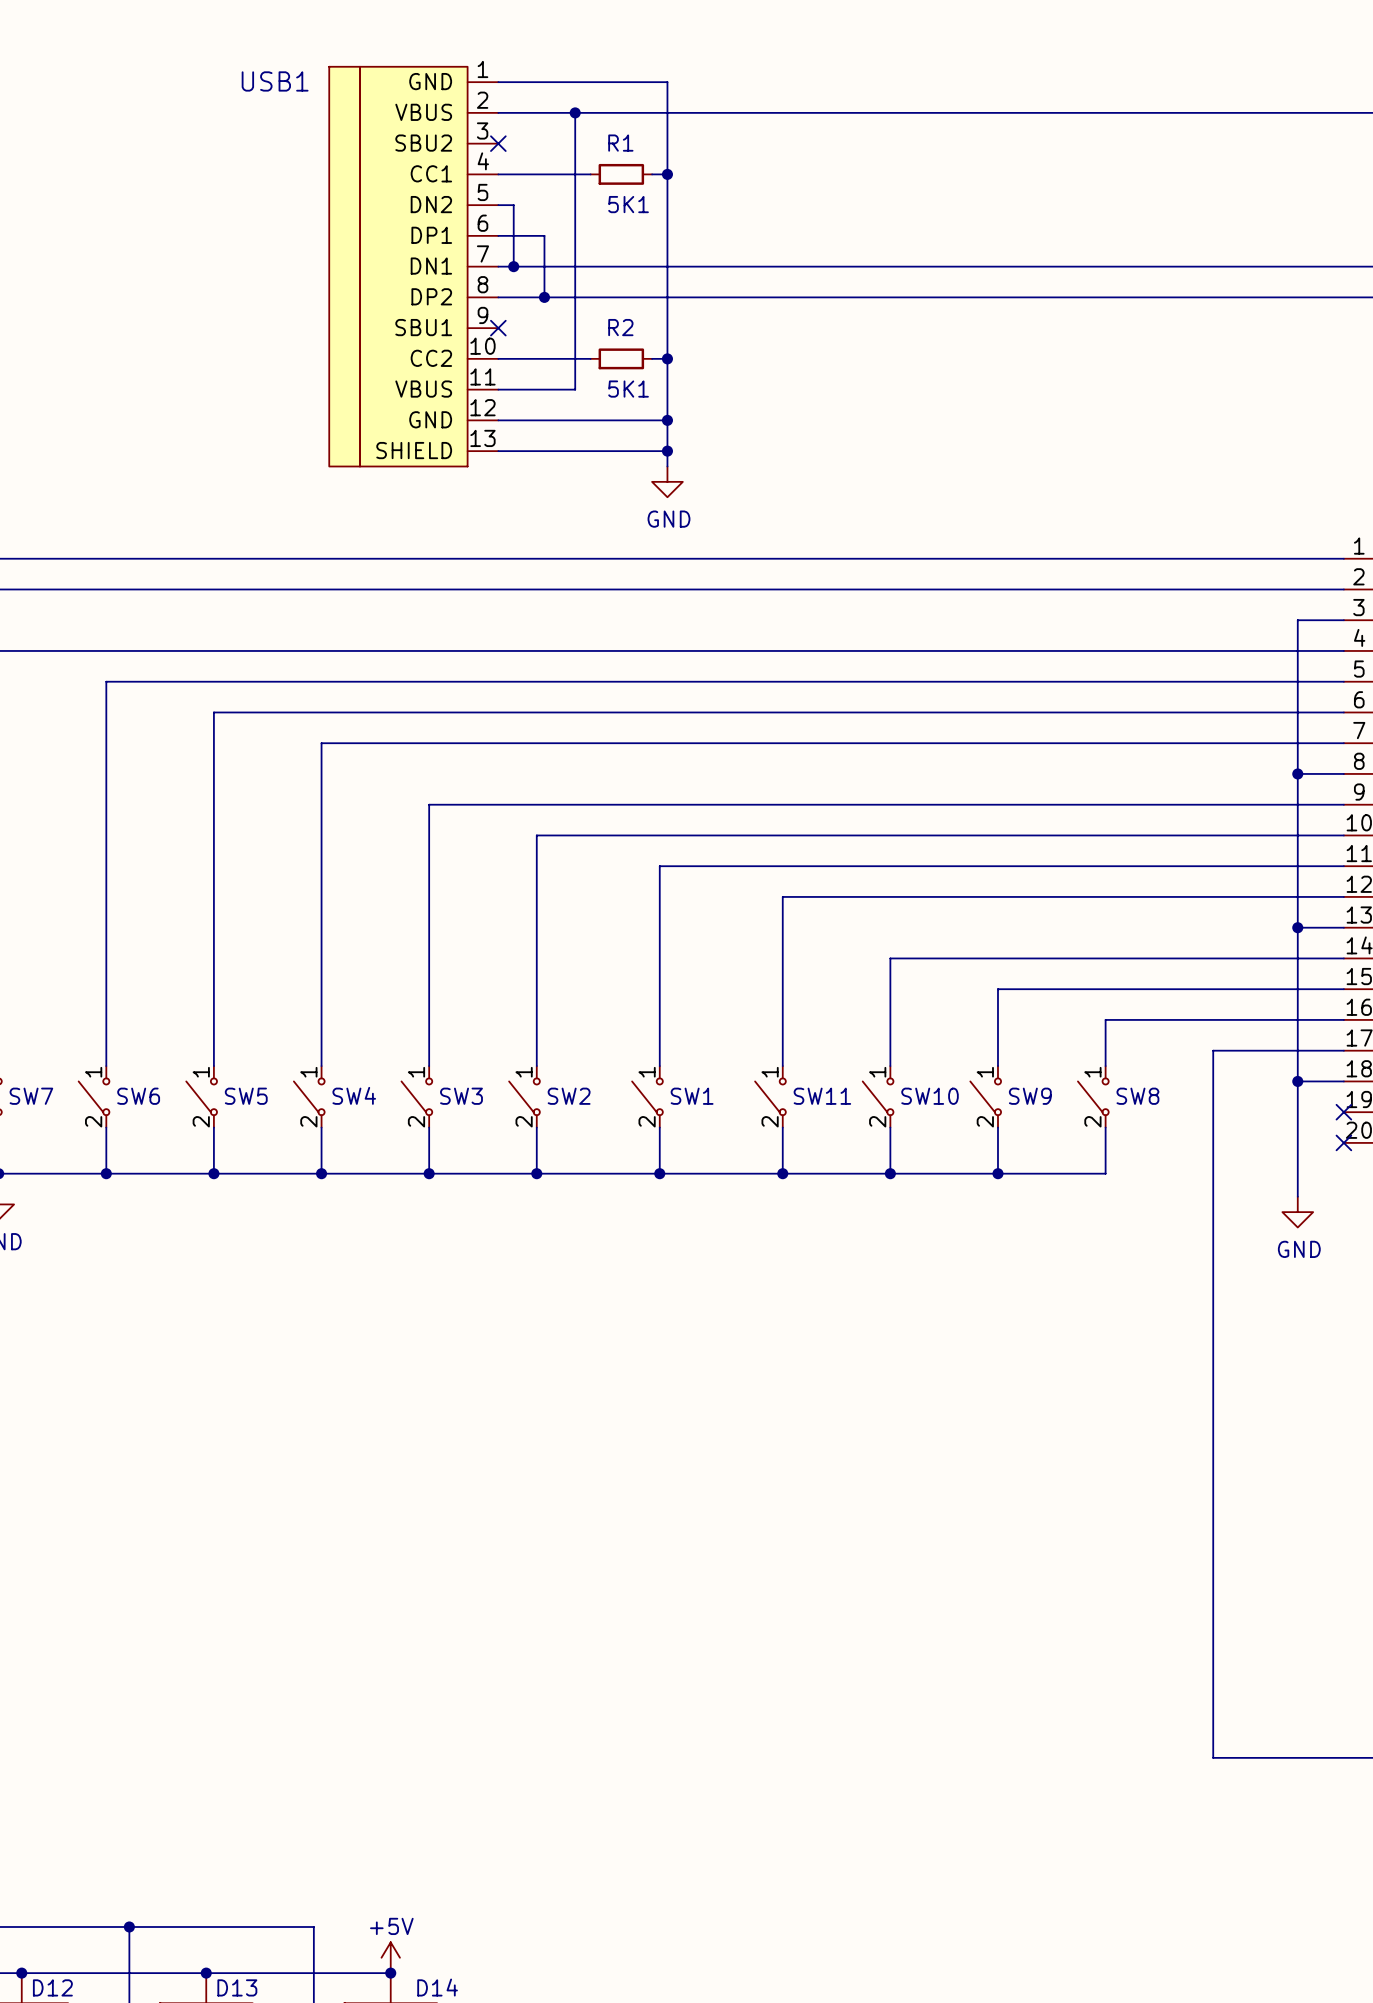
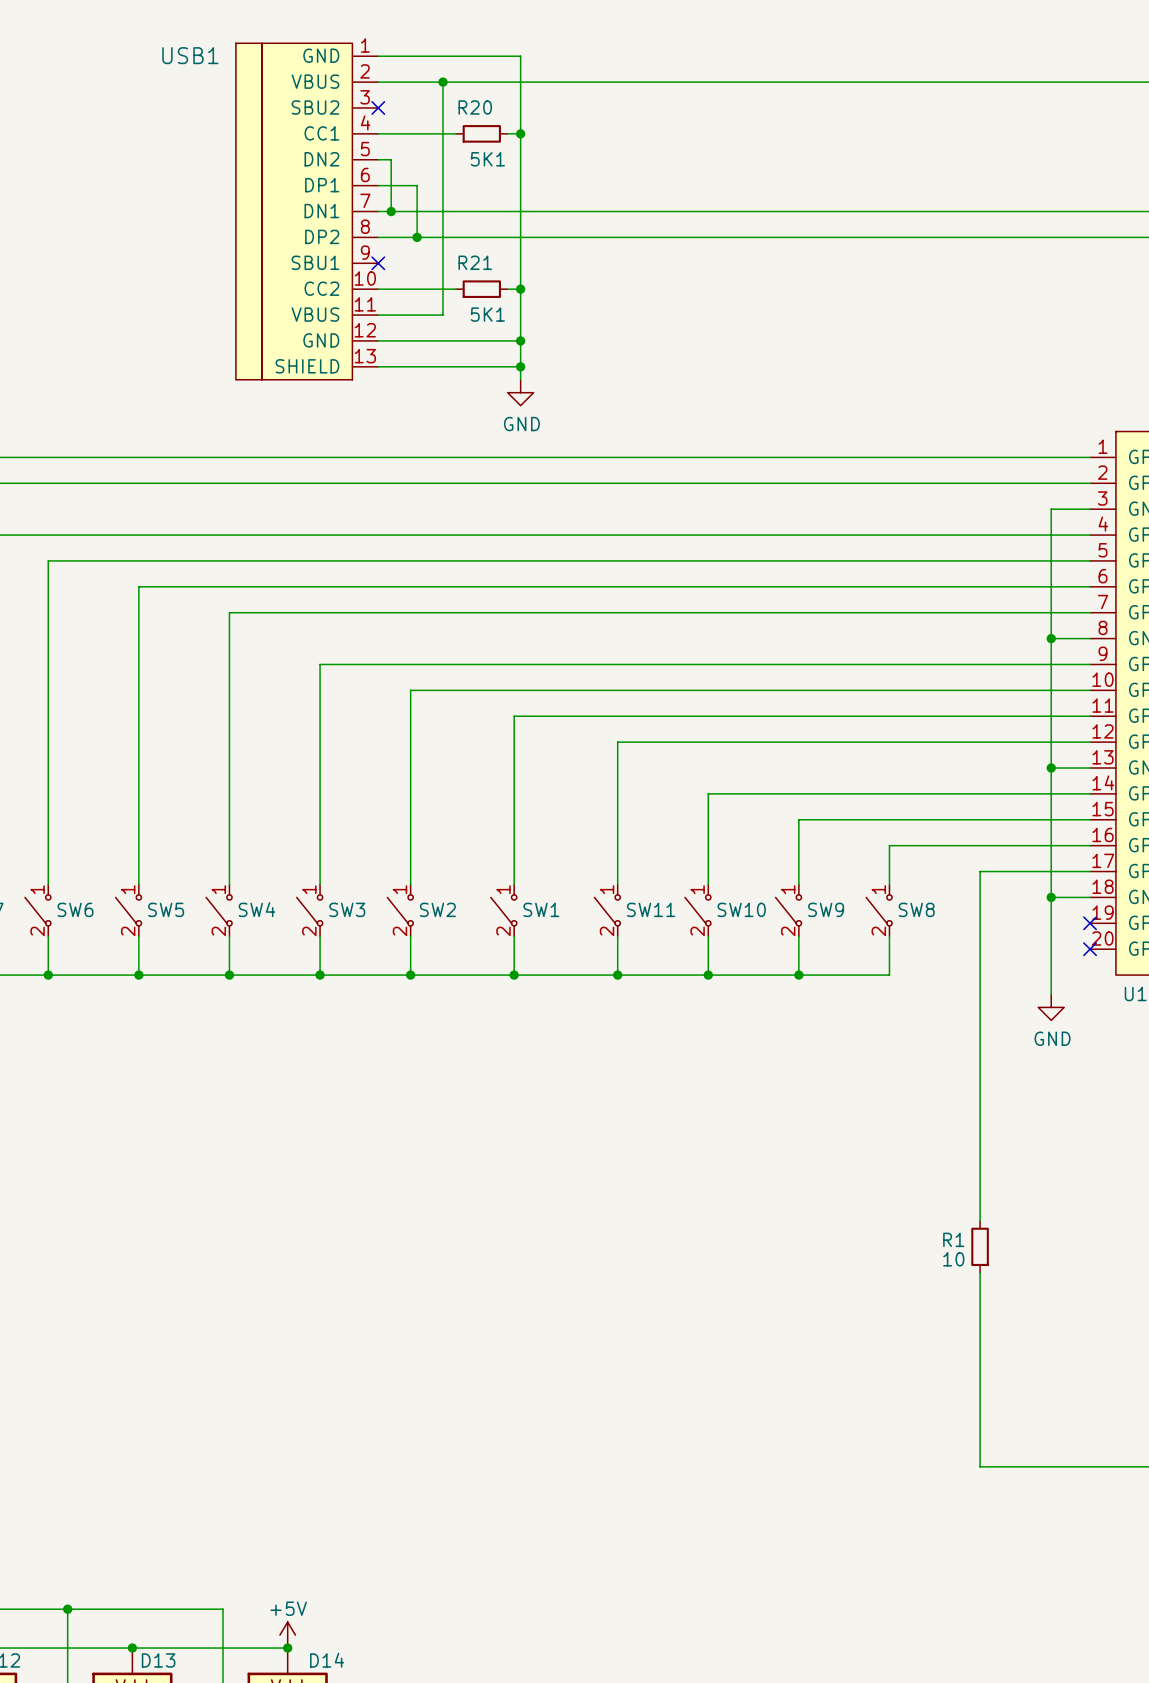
R1 name: R1 (620, 143) -> R20 (475, 107)
R2 name: R2 (620, 327) -> R21 (475, 262)
wire: (1213, 1465) (1213, 1527) -> none
R1: none -> 10 (980, 1246)

